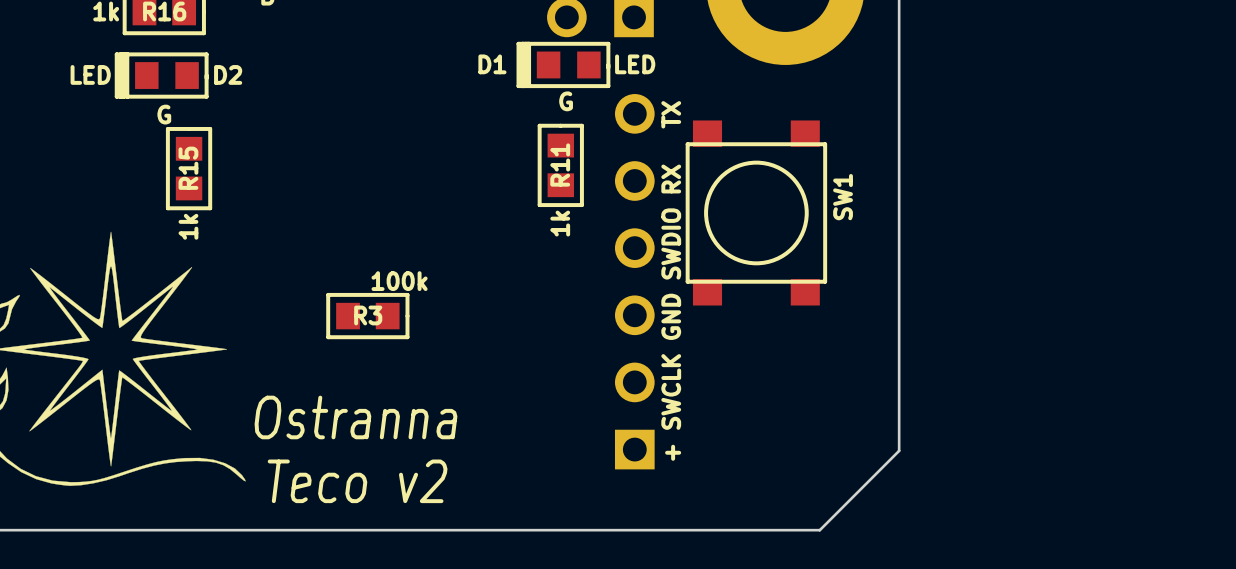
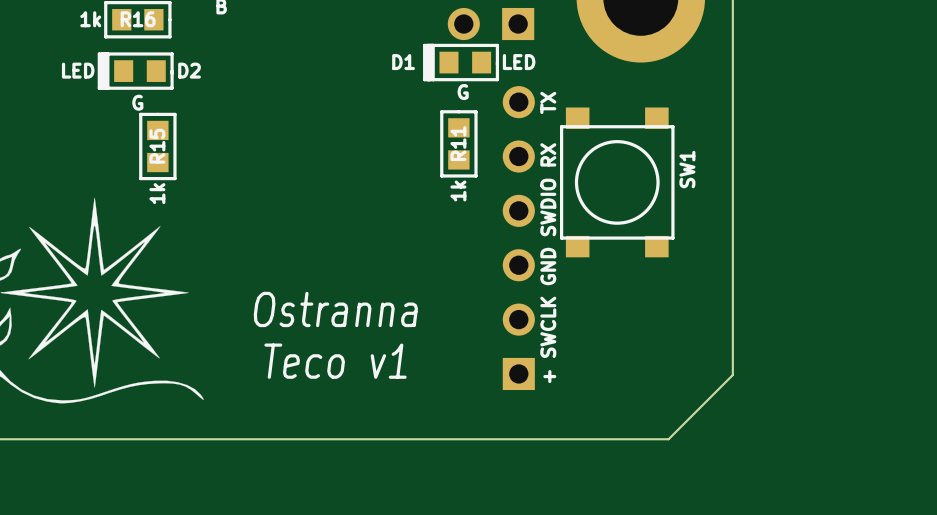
R3: 100k (367, 316) -> none
text position: Ostranna (355, 417) -> Ostranna (335, 309)
text: Teco v2 (357, 481) -> Teco v1 (335, 361)

